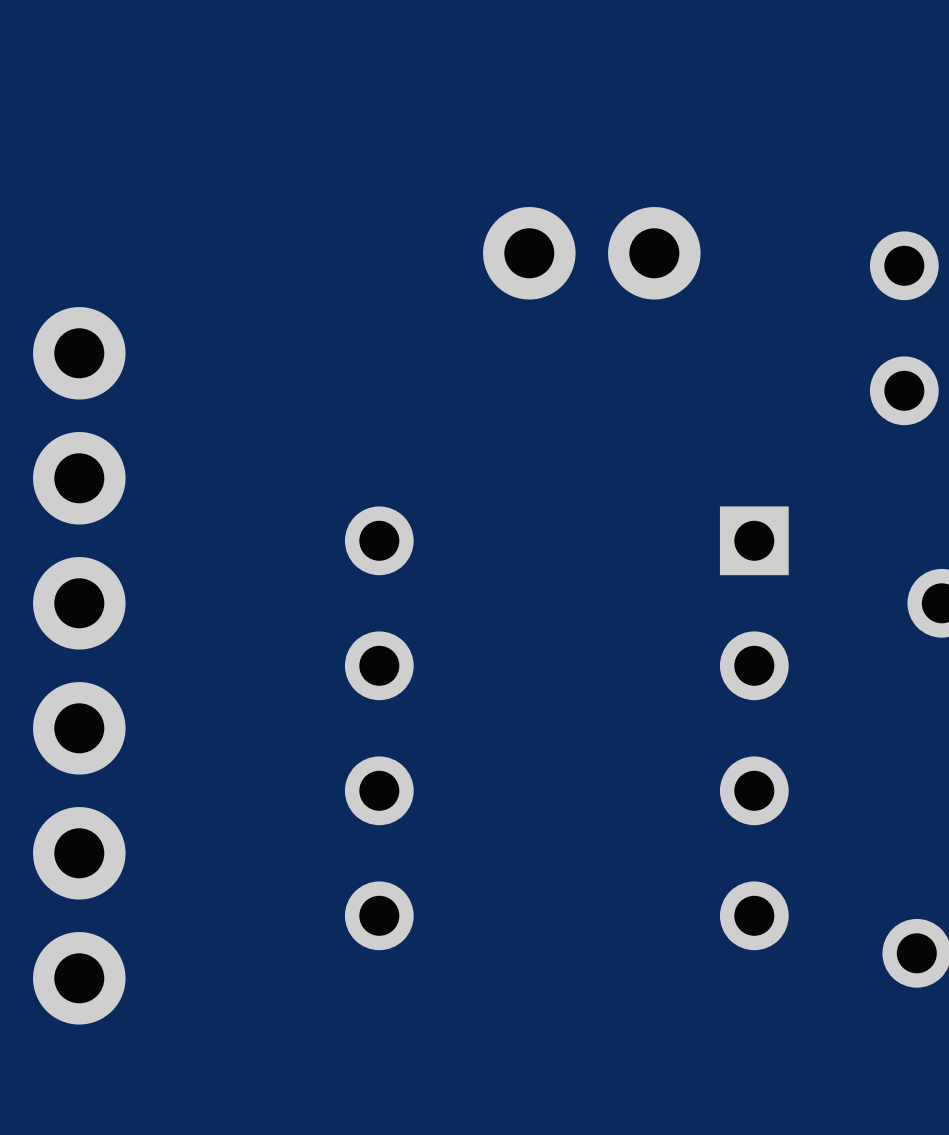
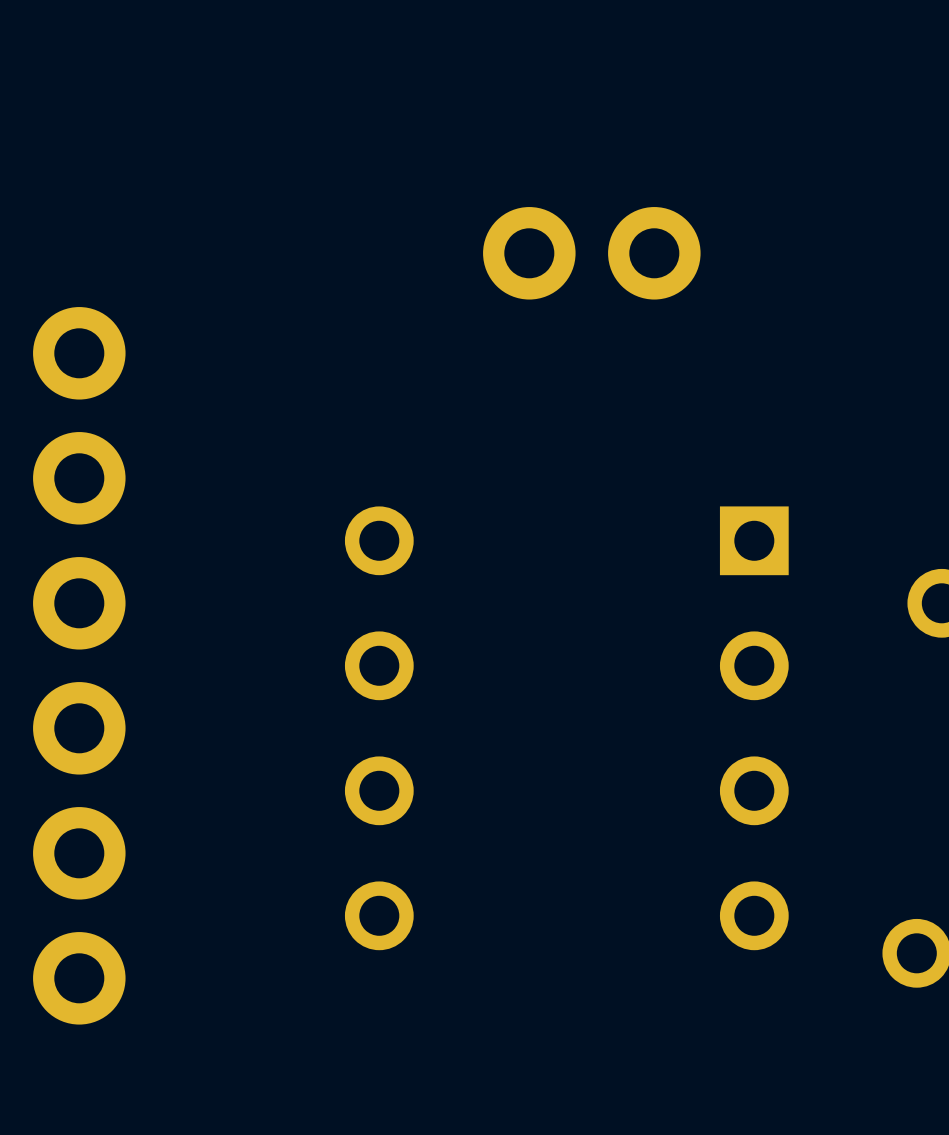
part: (904, 328) -> none

